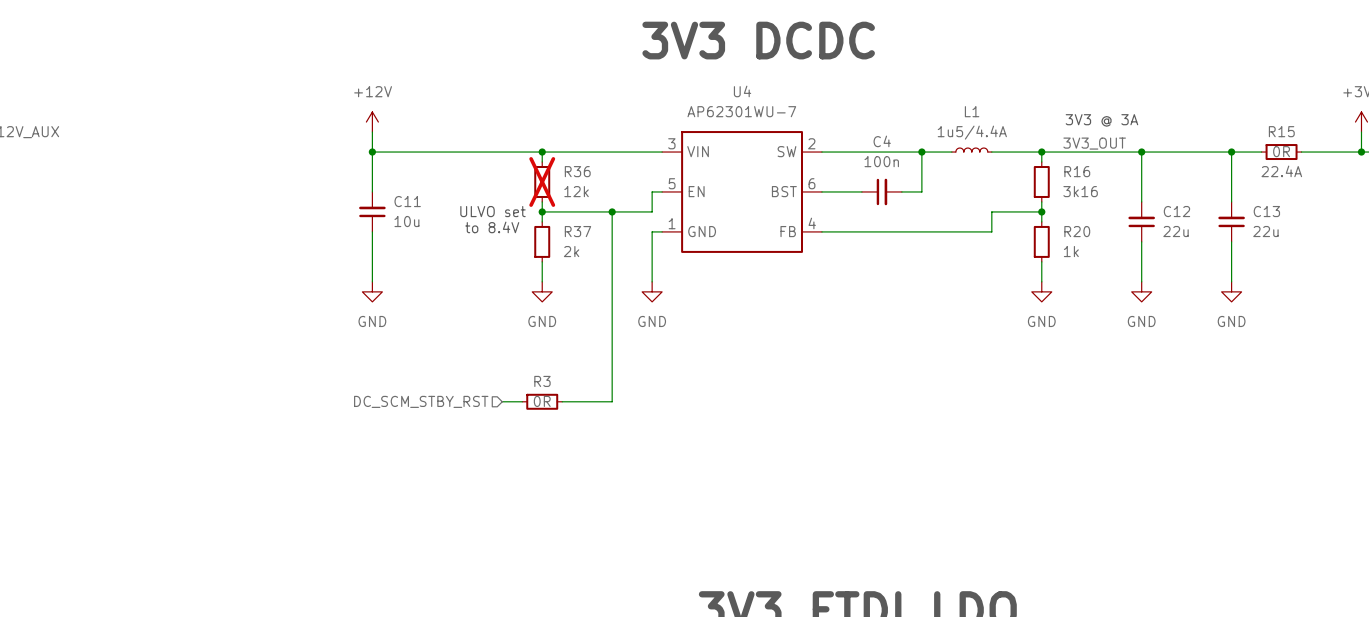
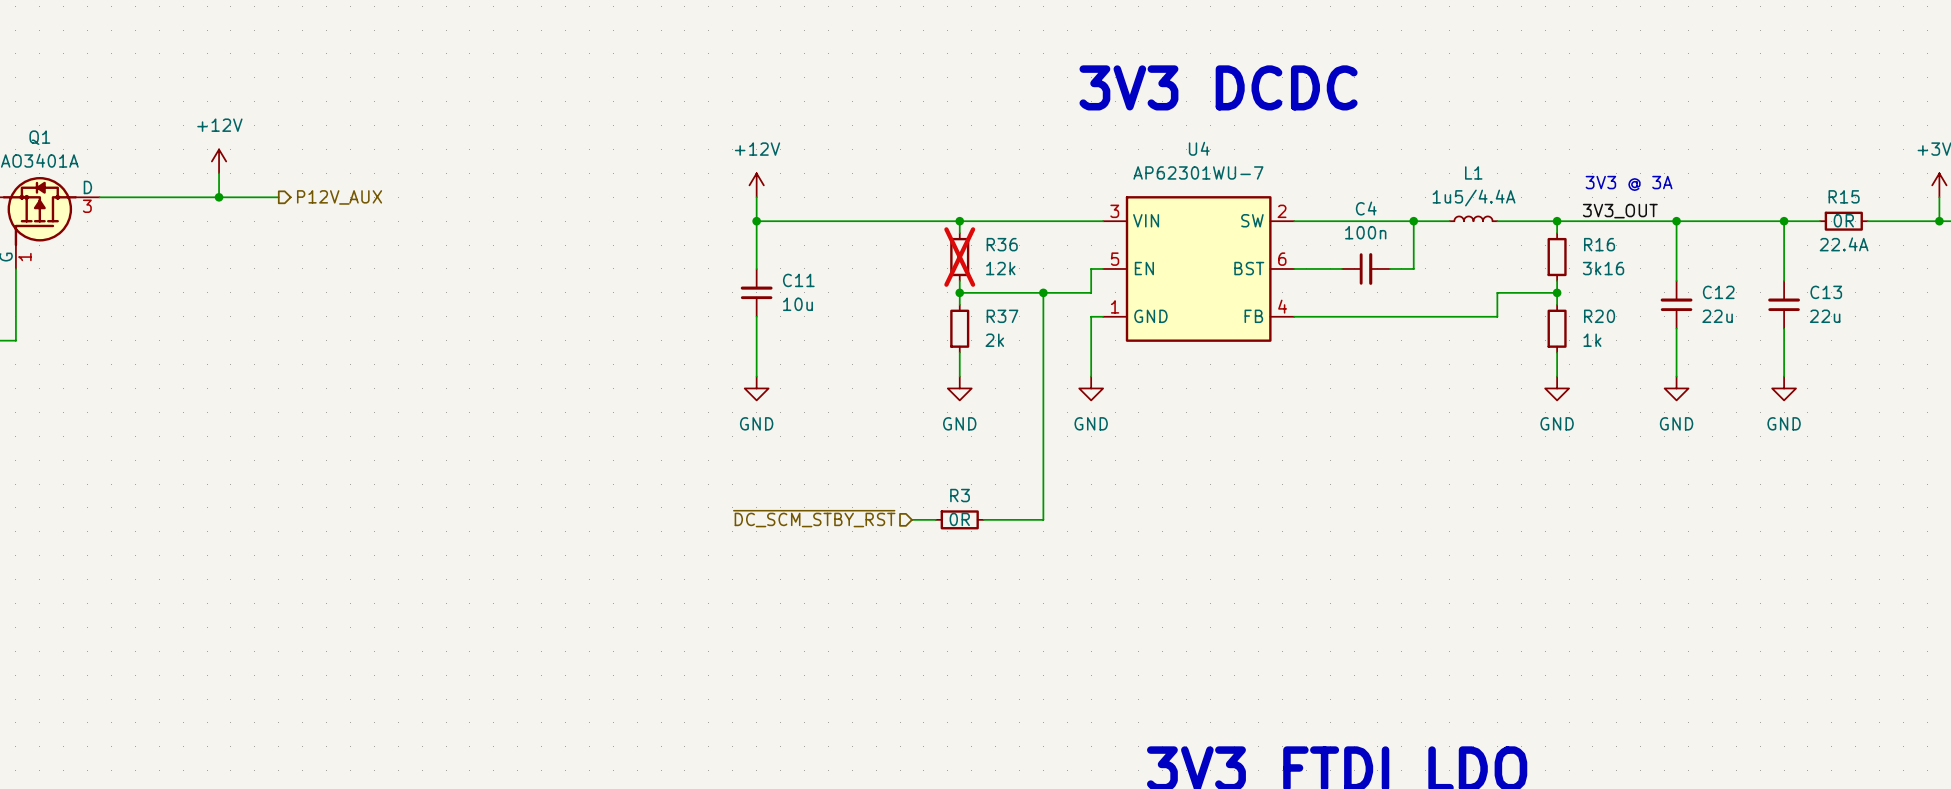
text: ULVO set (492, 211) -> none
text: to 8.4V (492, 227) -> none
hierarchical label: DC_SCM_STBY_RST (421, 401) -> ~{DC_SCM_STBY_RST} (814, 518)

